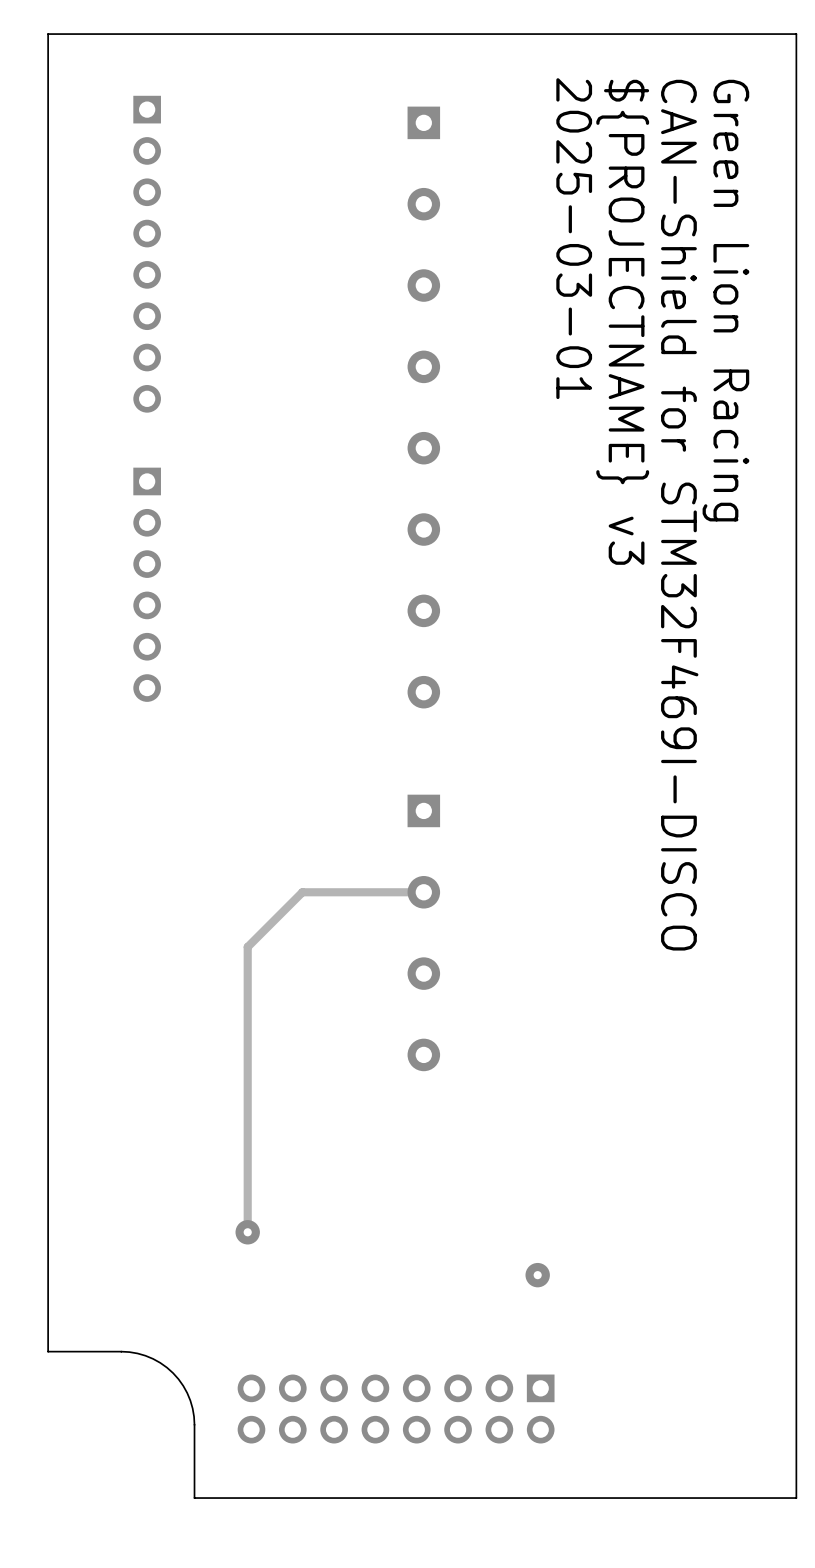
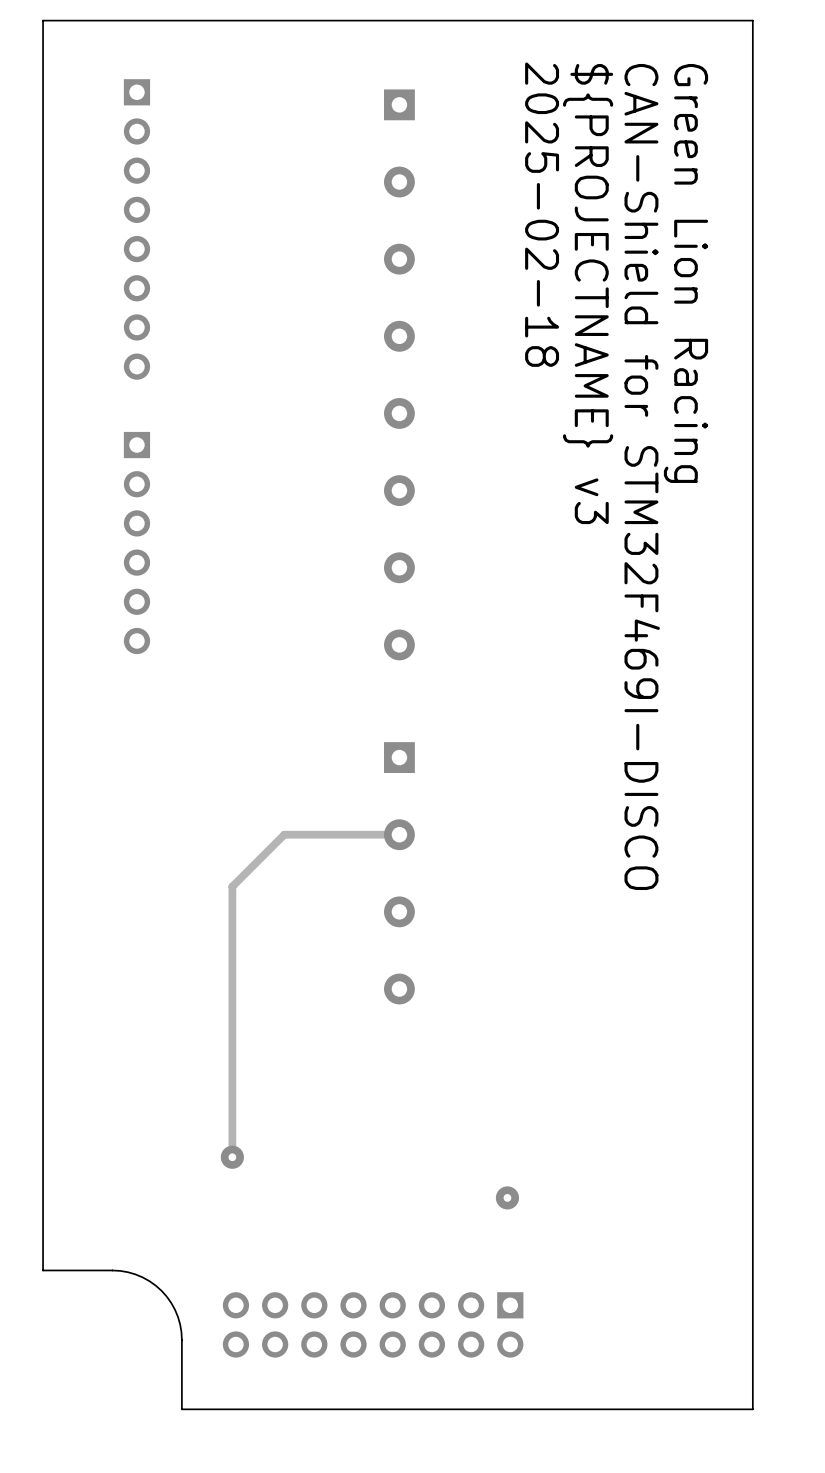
text: 2025-03-01 (574, 238) -> 2025-02-18 (542, 214)

